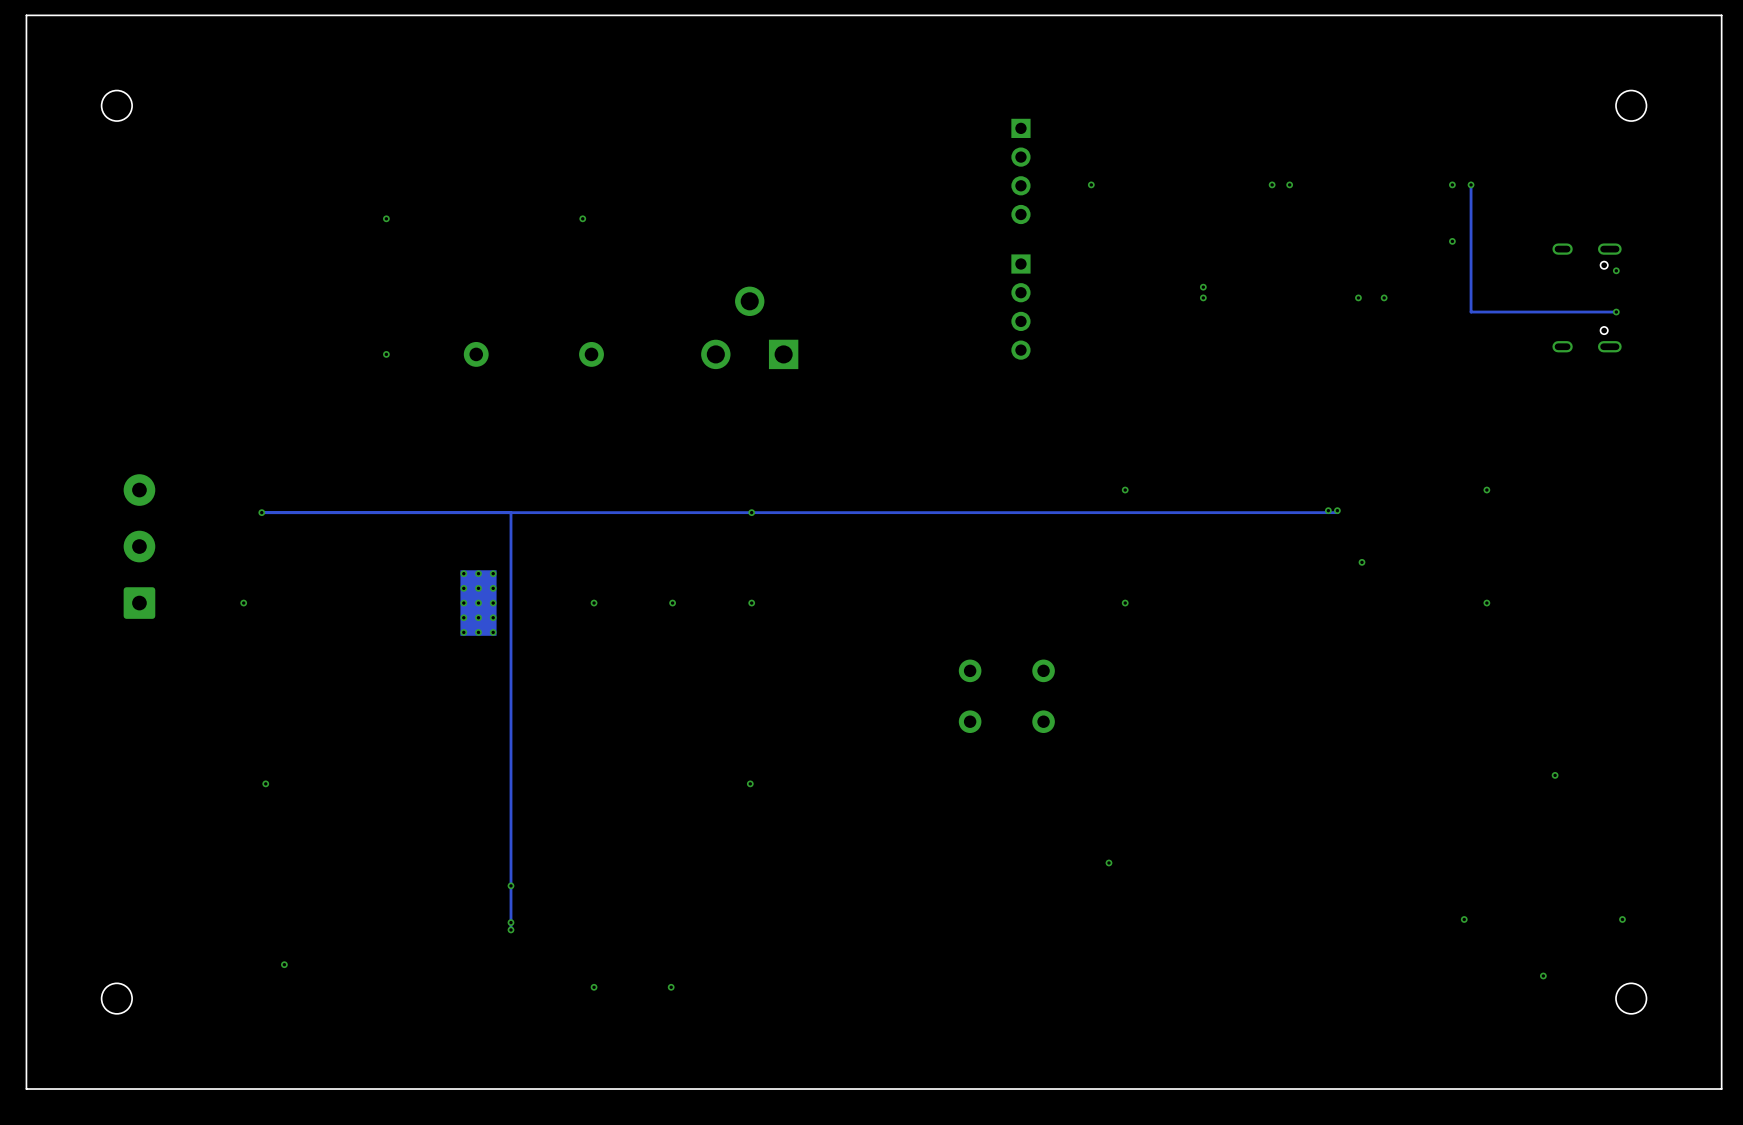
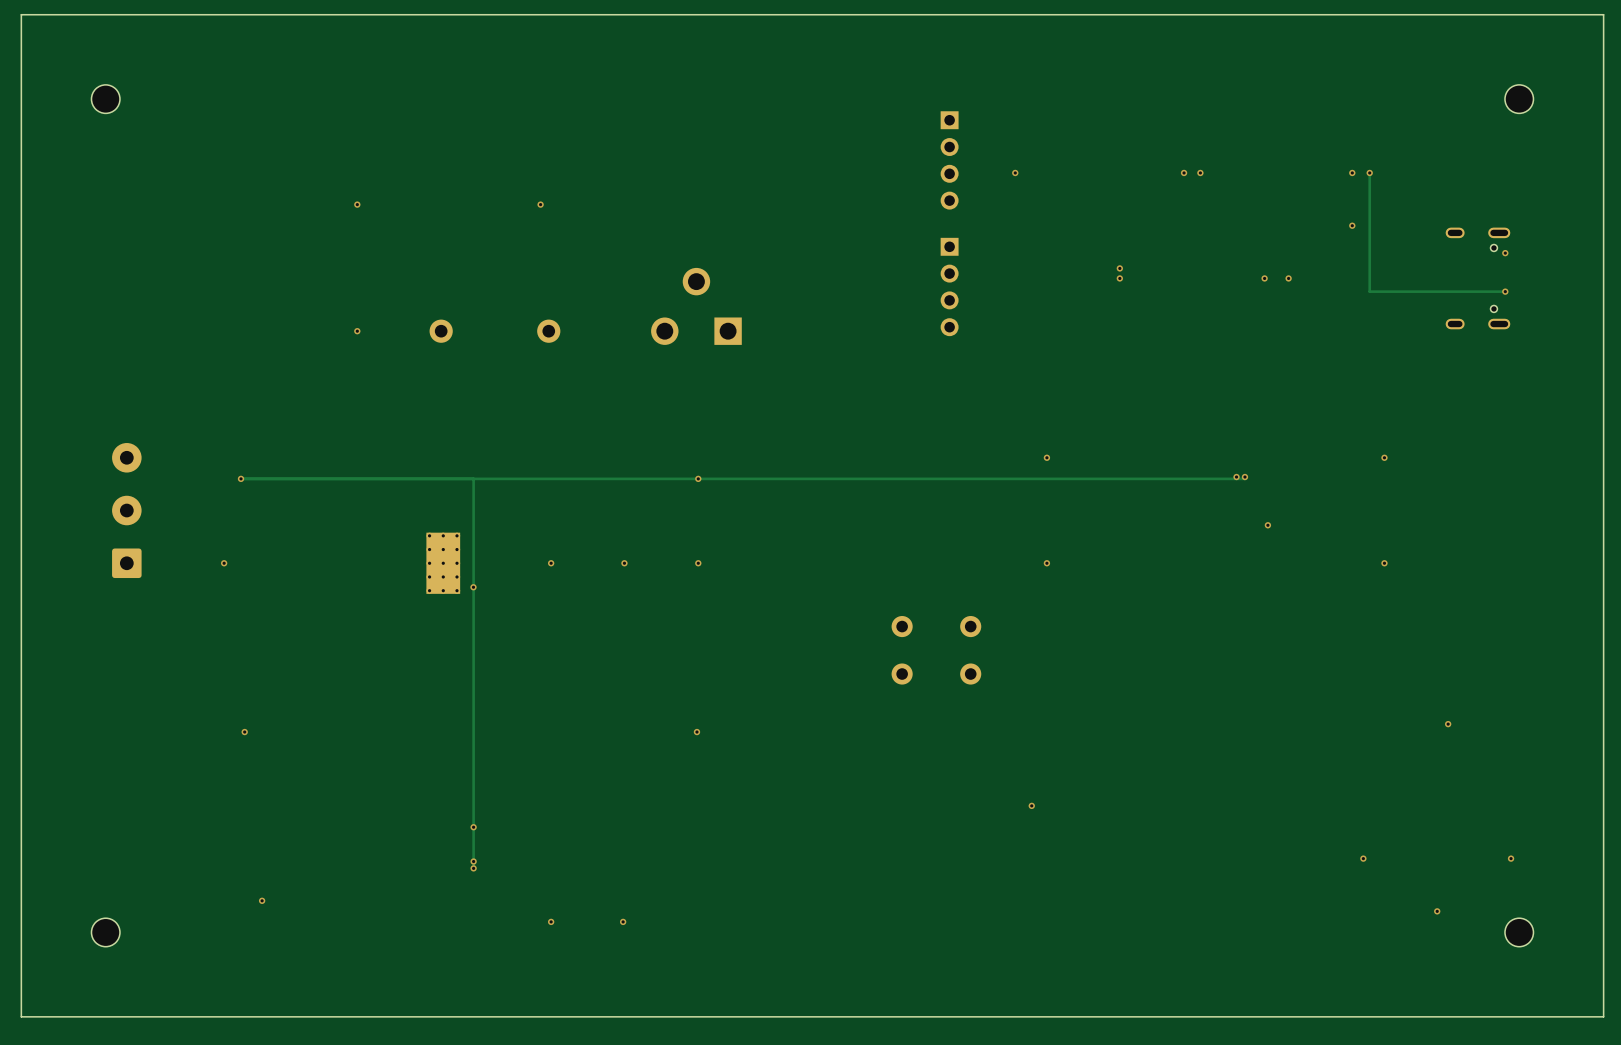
via: none -> (473, 587)

